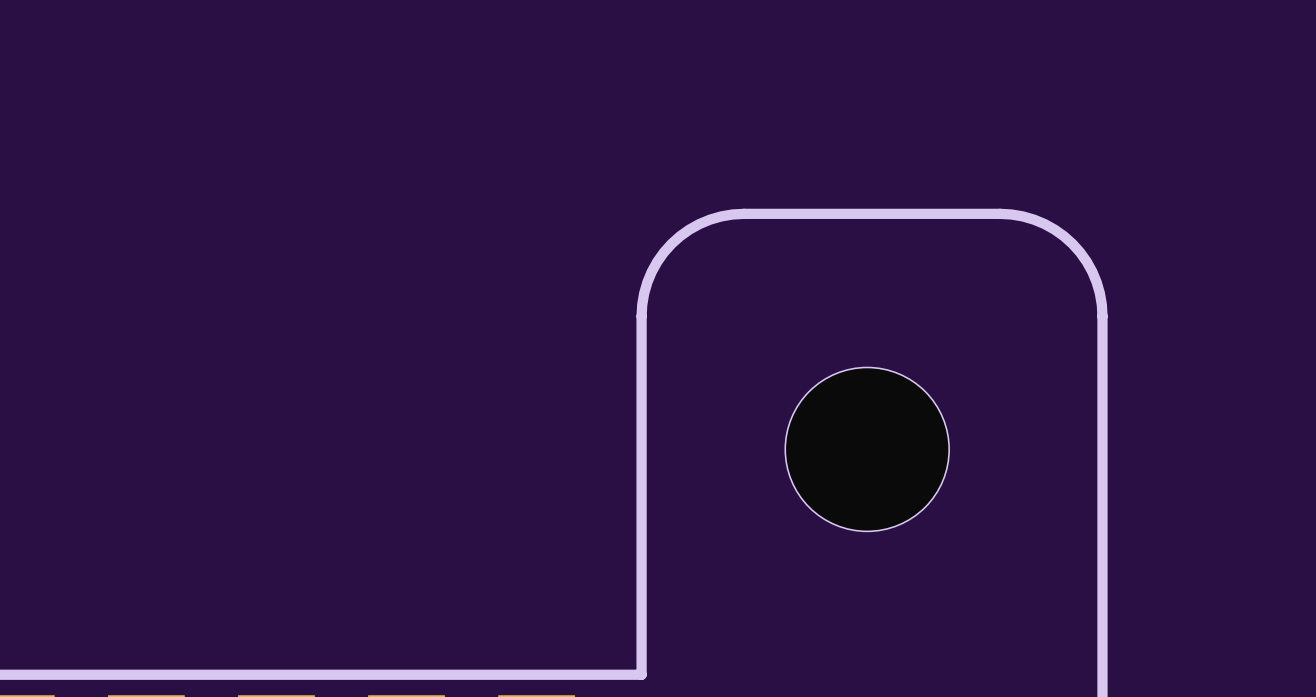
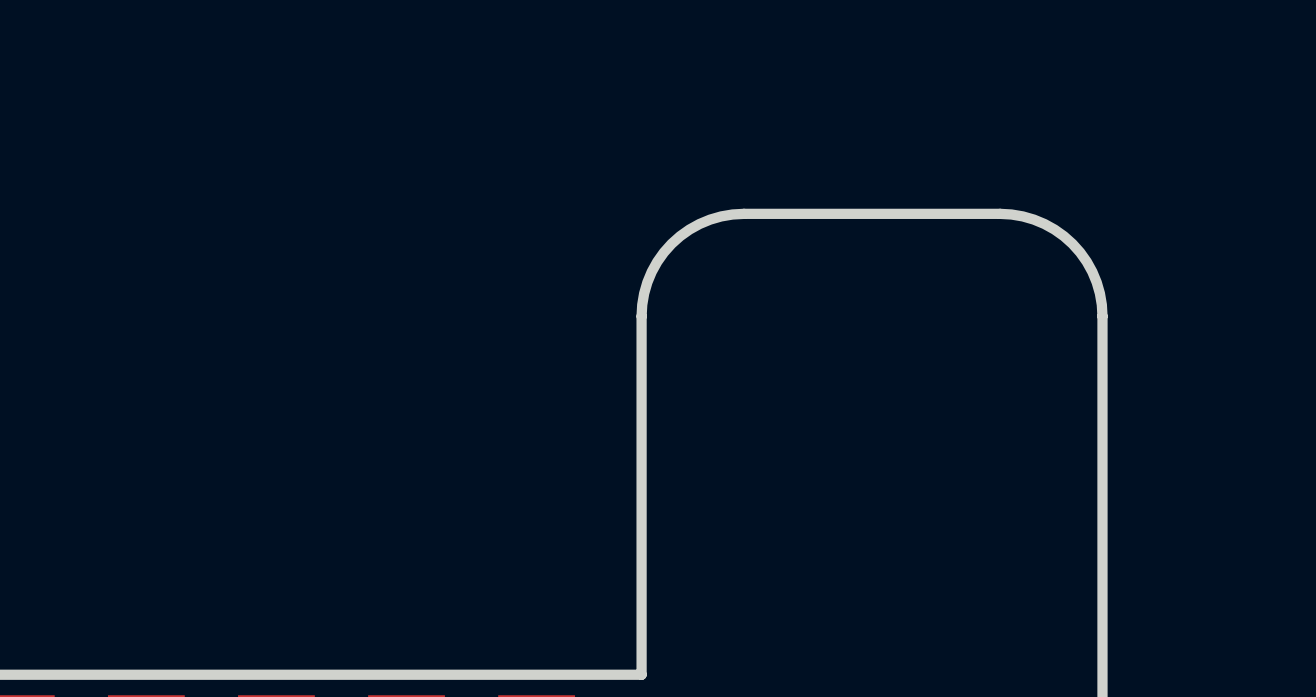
part: (867, 449) -> none

